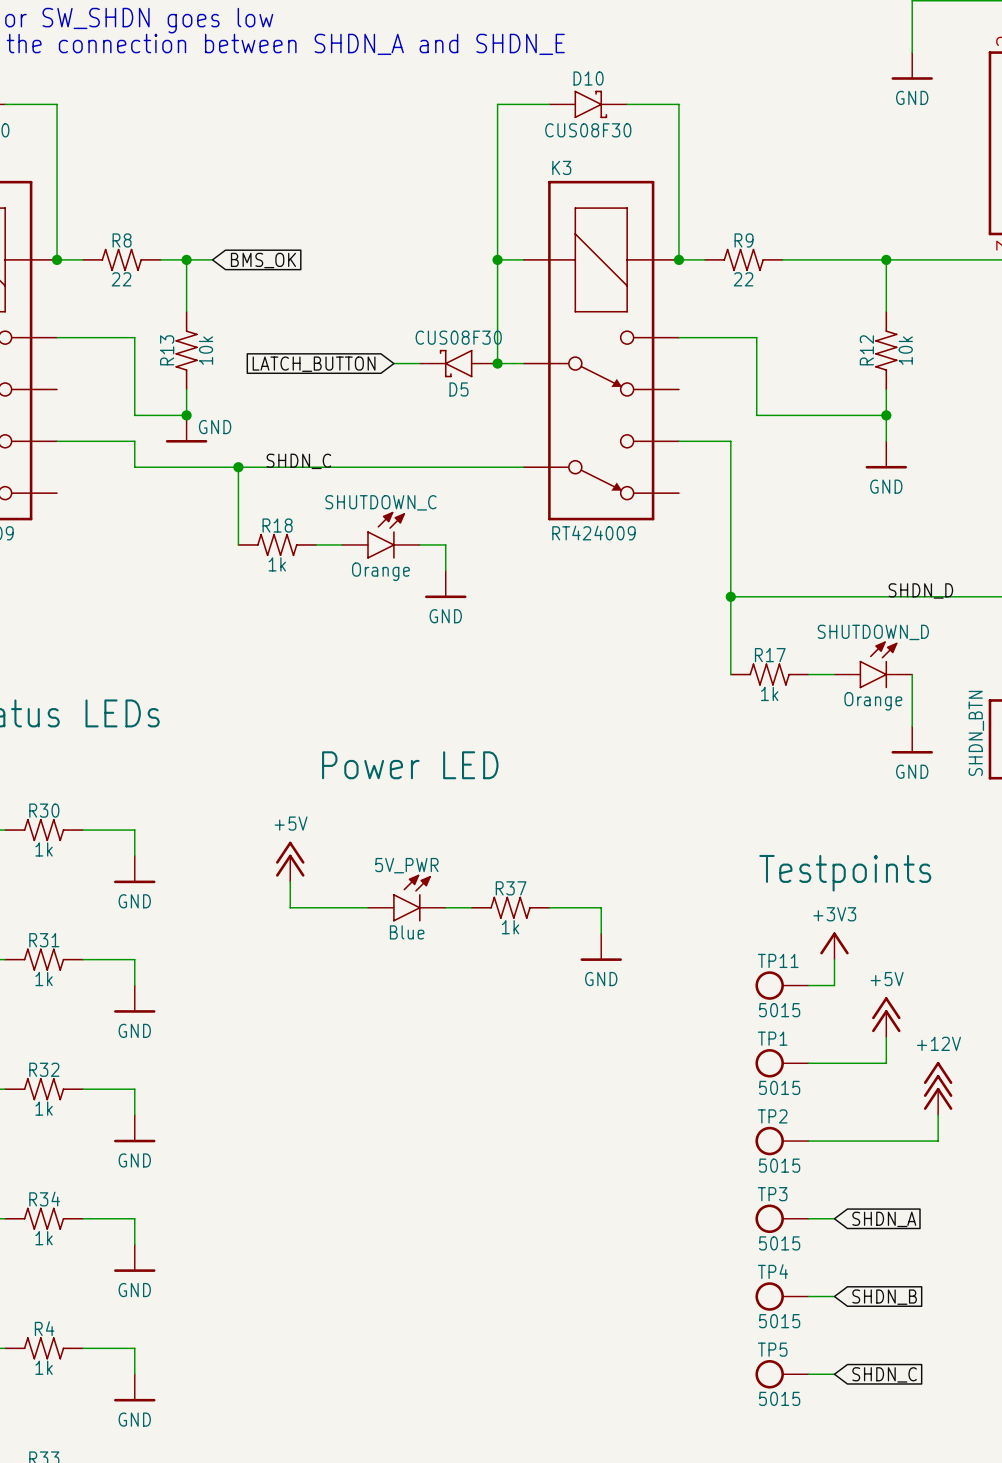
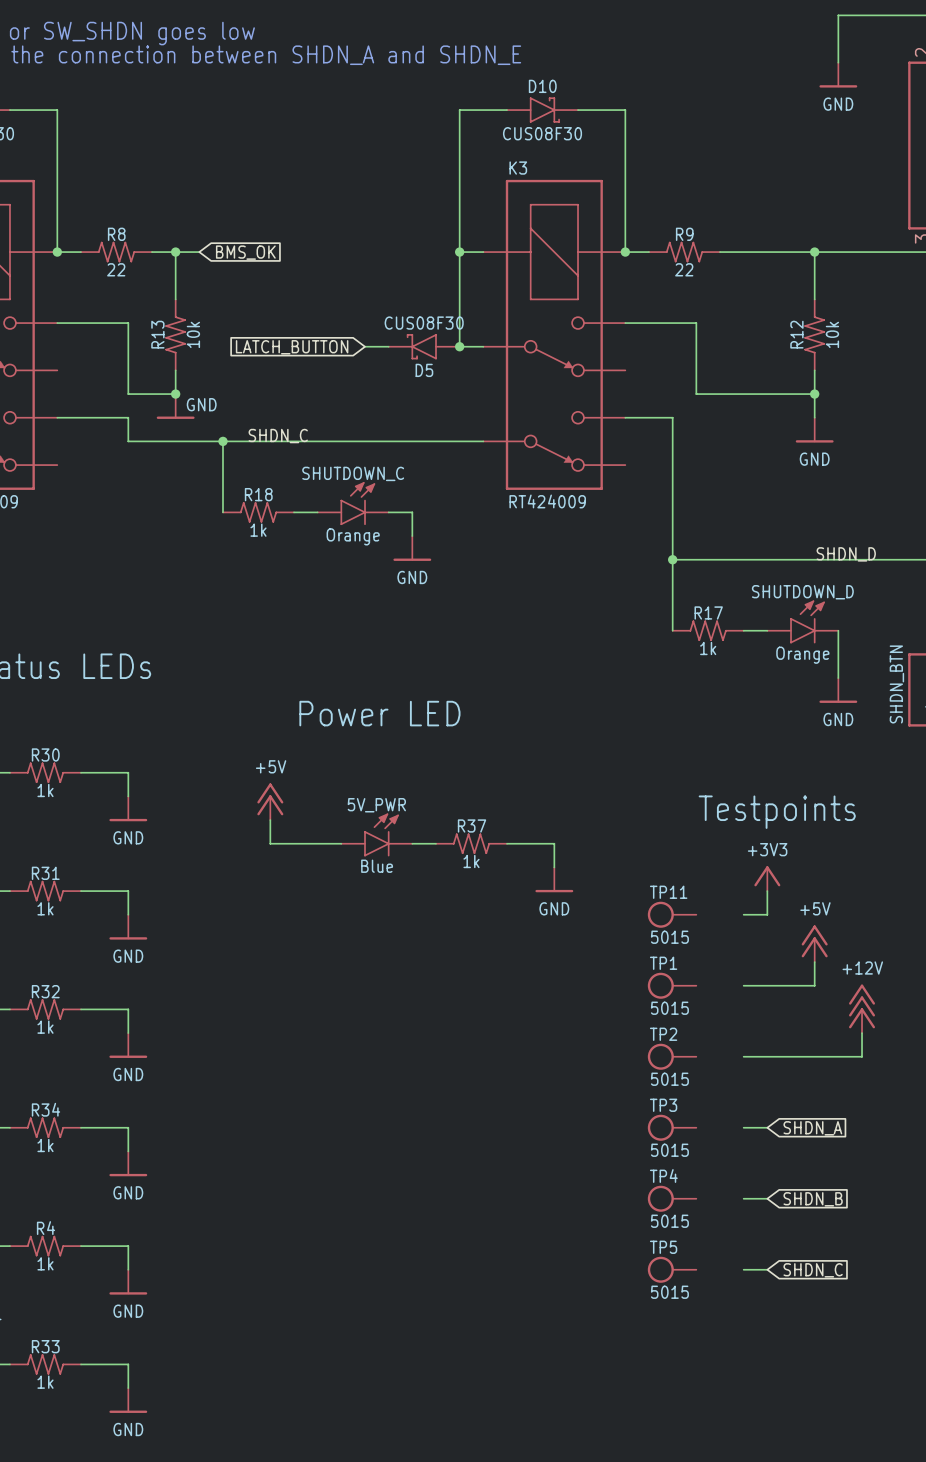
TP11 position: (782, 985) -> (672, 914)
TP1 position: (782, 1063) -> (672, 985)
TP2 position: (782, 1141) -> (672, 1056)
TP3 position: (782, 1218) -> (672, 1127)
TP4 position: (782, 1296) -> (672, 1198)
TP5 position: (782, 1374) -> (672, 1269)

